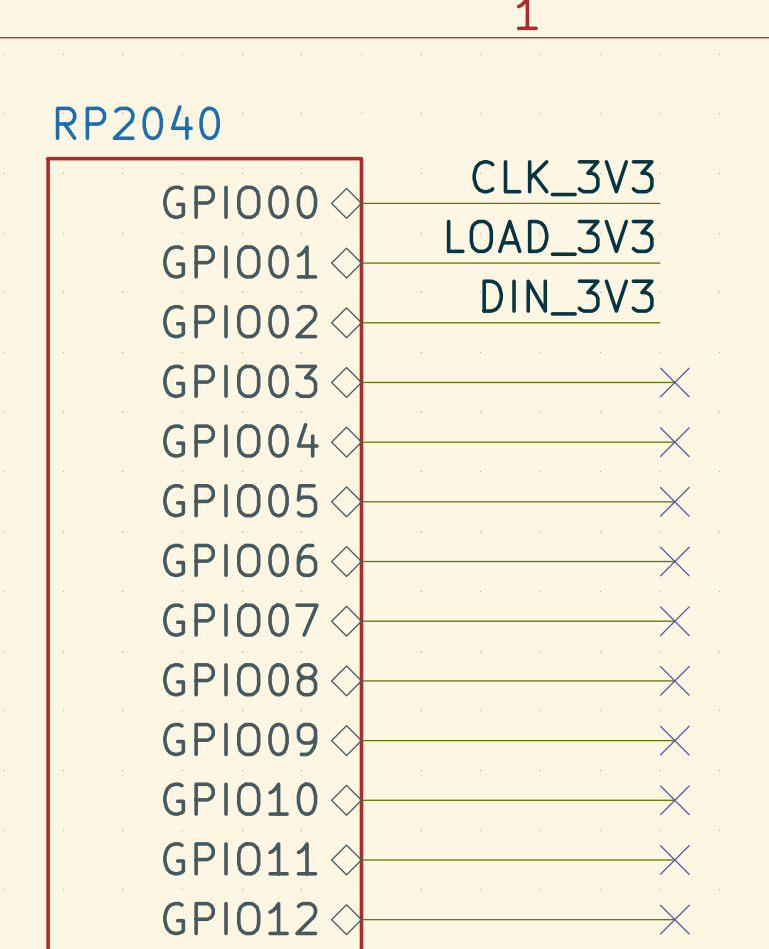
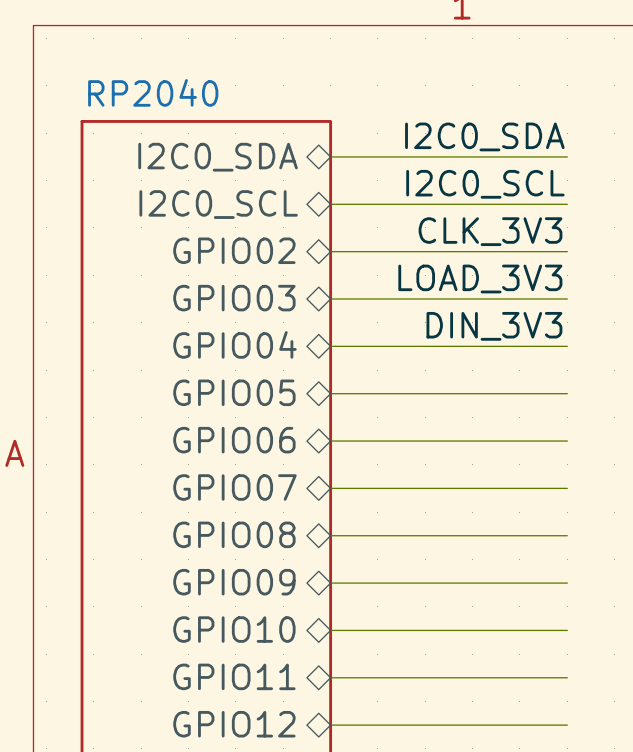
label: CLK_3V3 (563, 178) -> I2C0_SDA (484, 136)
sheet pin: GPIO00 (240, 202) -> I2C0_SDA (218, 157)
label: LOAD_3V3 (550, 237) -> I2C0_SCL (485, 184)
sheet pin: GPIO01 (240, 261) -> I2C0_SCL (218, 204)
label: DIN_3V3 (568, 297) -> CLK_3V3 (490, 231)
label: none -> LOAD_3V3 (480, 279)
wire: (659, 382) (674, 382) -> none
no-connect mark: (674, 382) -> none
label: none -> DIN_3V3 (494, 326)
wire: (659, 442) (674, 442) -> none
no-connect mark: (674, 442) -> none
wire: (659, 501) (674, 501) -> none
no-connect mark: (674, 501) -> none
wire: (659, 561) (674, 561) -> none
no-connect mark: (674, 561) -> none
wire: (659, 621) (674, 621) -> none
no-connect mark: (674, 621) -> none
wire: (659, 680) (674, 680) -> none
no-connect mark: (674, 680) -> none
wire: (659, 740) (674, 740) -> none
no-connect mark: (674, 740) -> none
wire: (659, 800) (674, 800) -> none
no-connect mark: (674, 800) -> none
wire: (659, 859) (674, 859) -> none
no-connect mark: (674, 859) -> none
wire: (659, 919) (674, 919) -> none
no-connect mark: (674, 919) -> none

